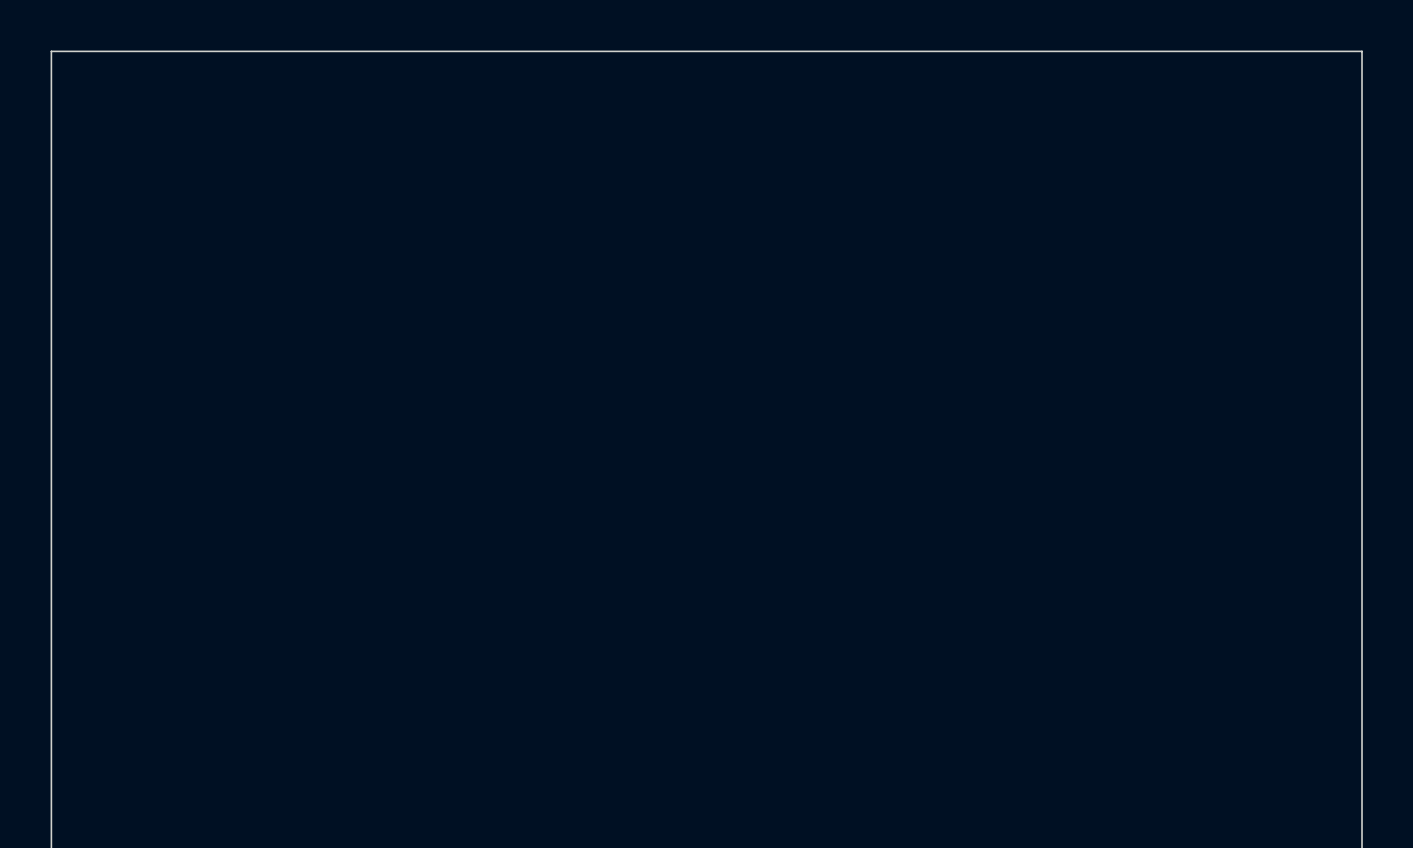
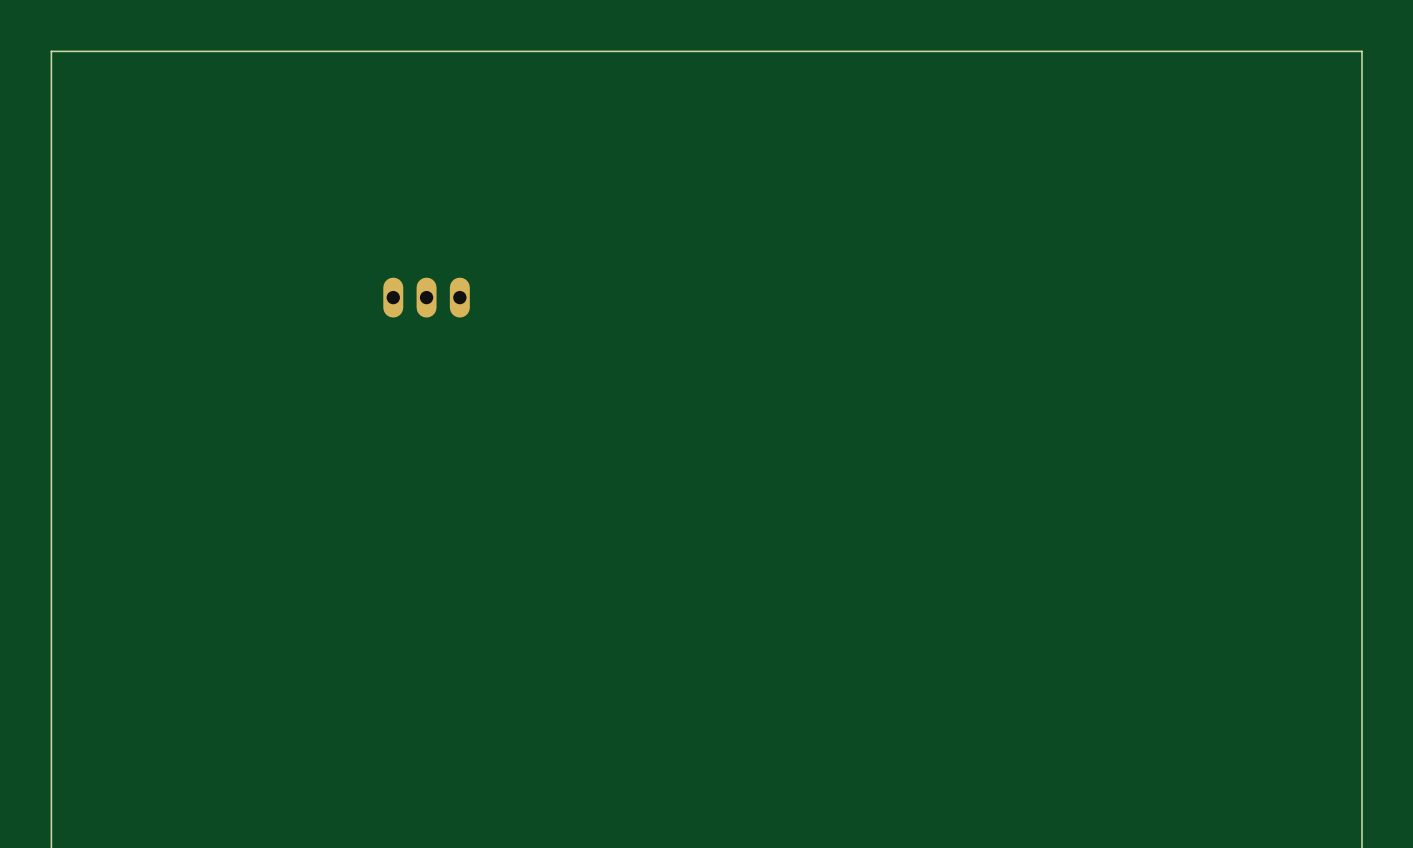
part: none -> (426, 297)

